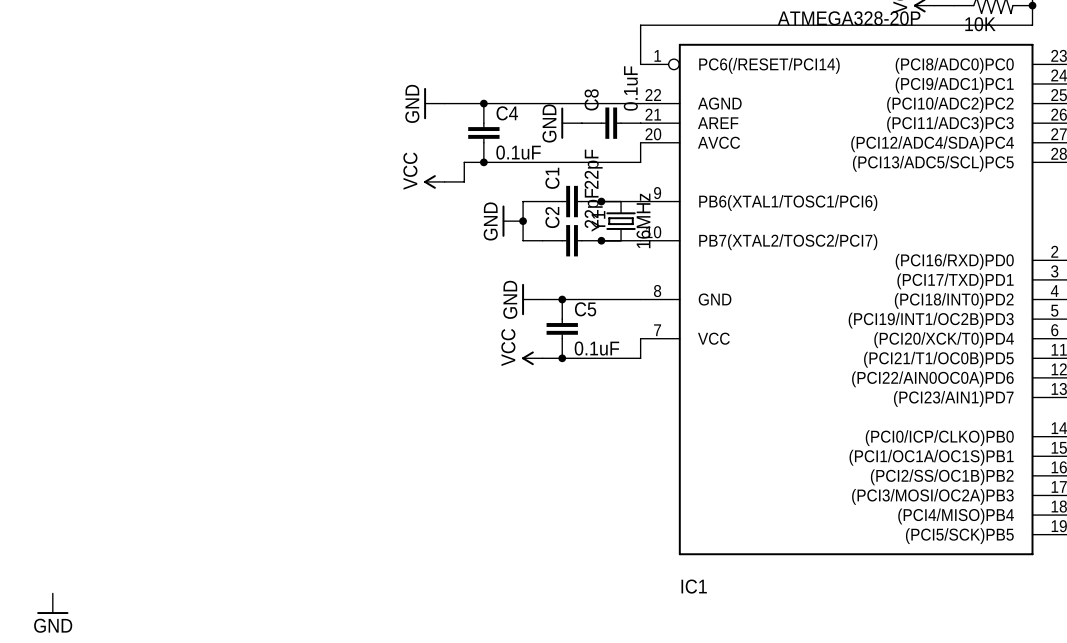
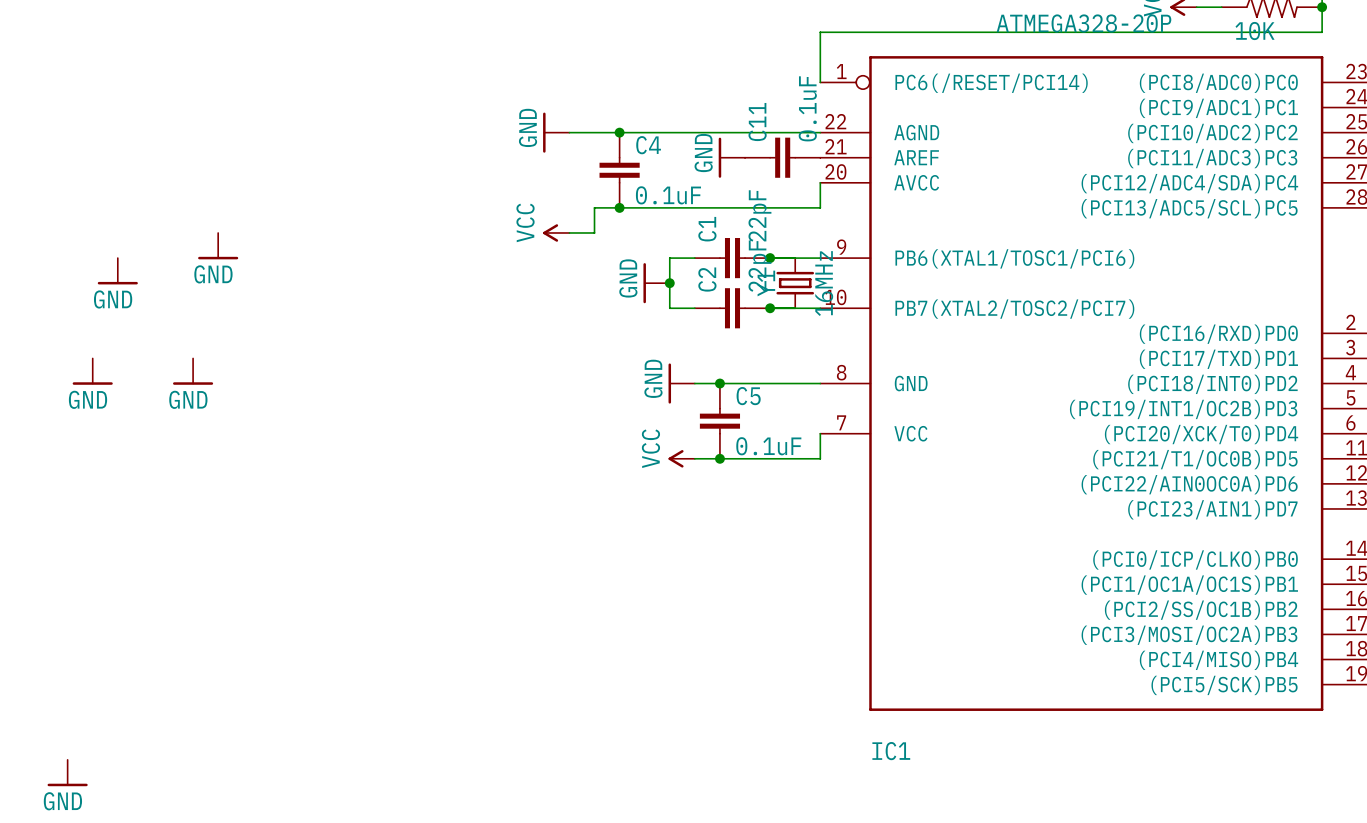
C8 name: C8 (591, 99) -> C11 (757, 122)
power symbol: none -> GND (218, 246)
power symbol: none -> GND (117, 271)
power symbol: none -> GND (92, 371)
power symbol: none -> GND (193, 371)

